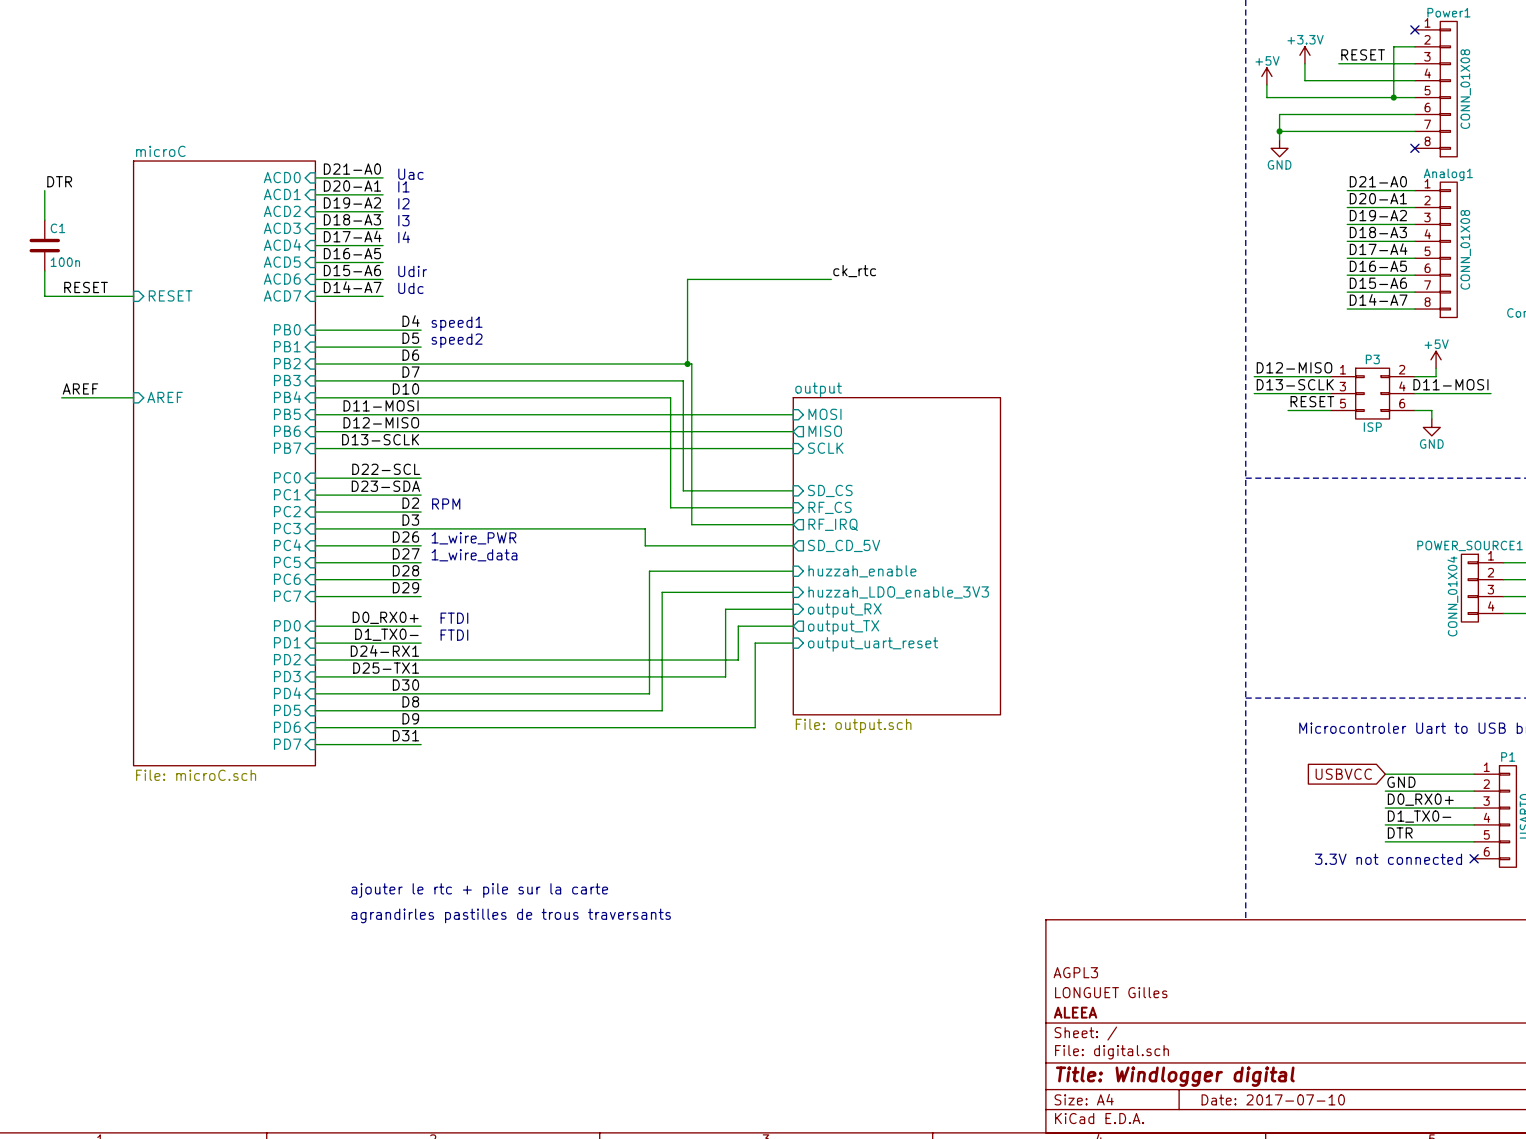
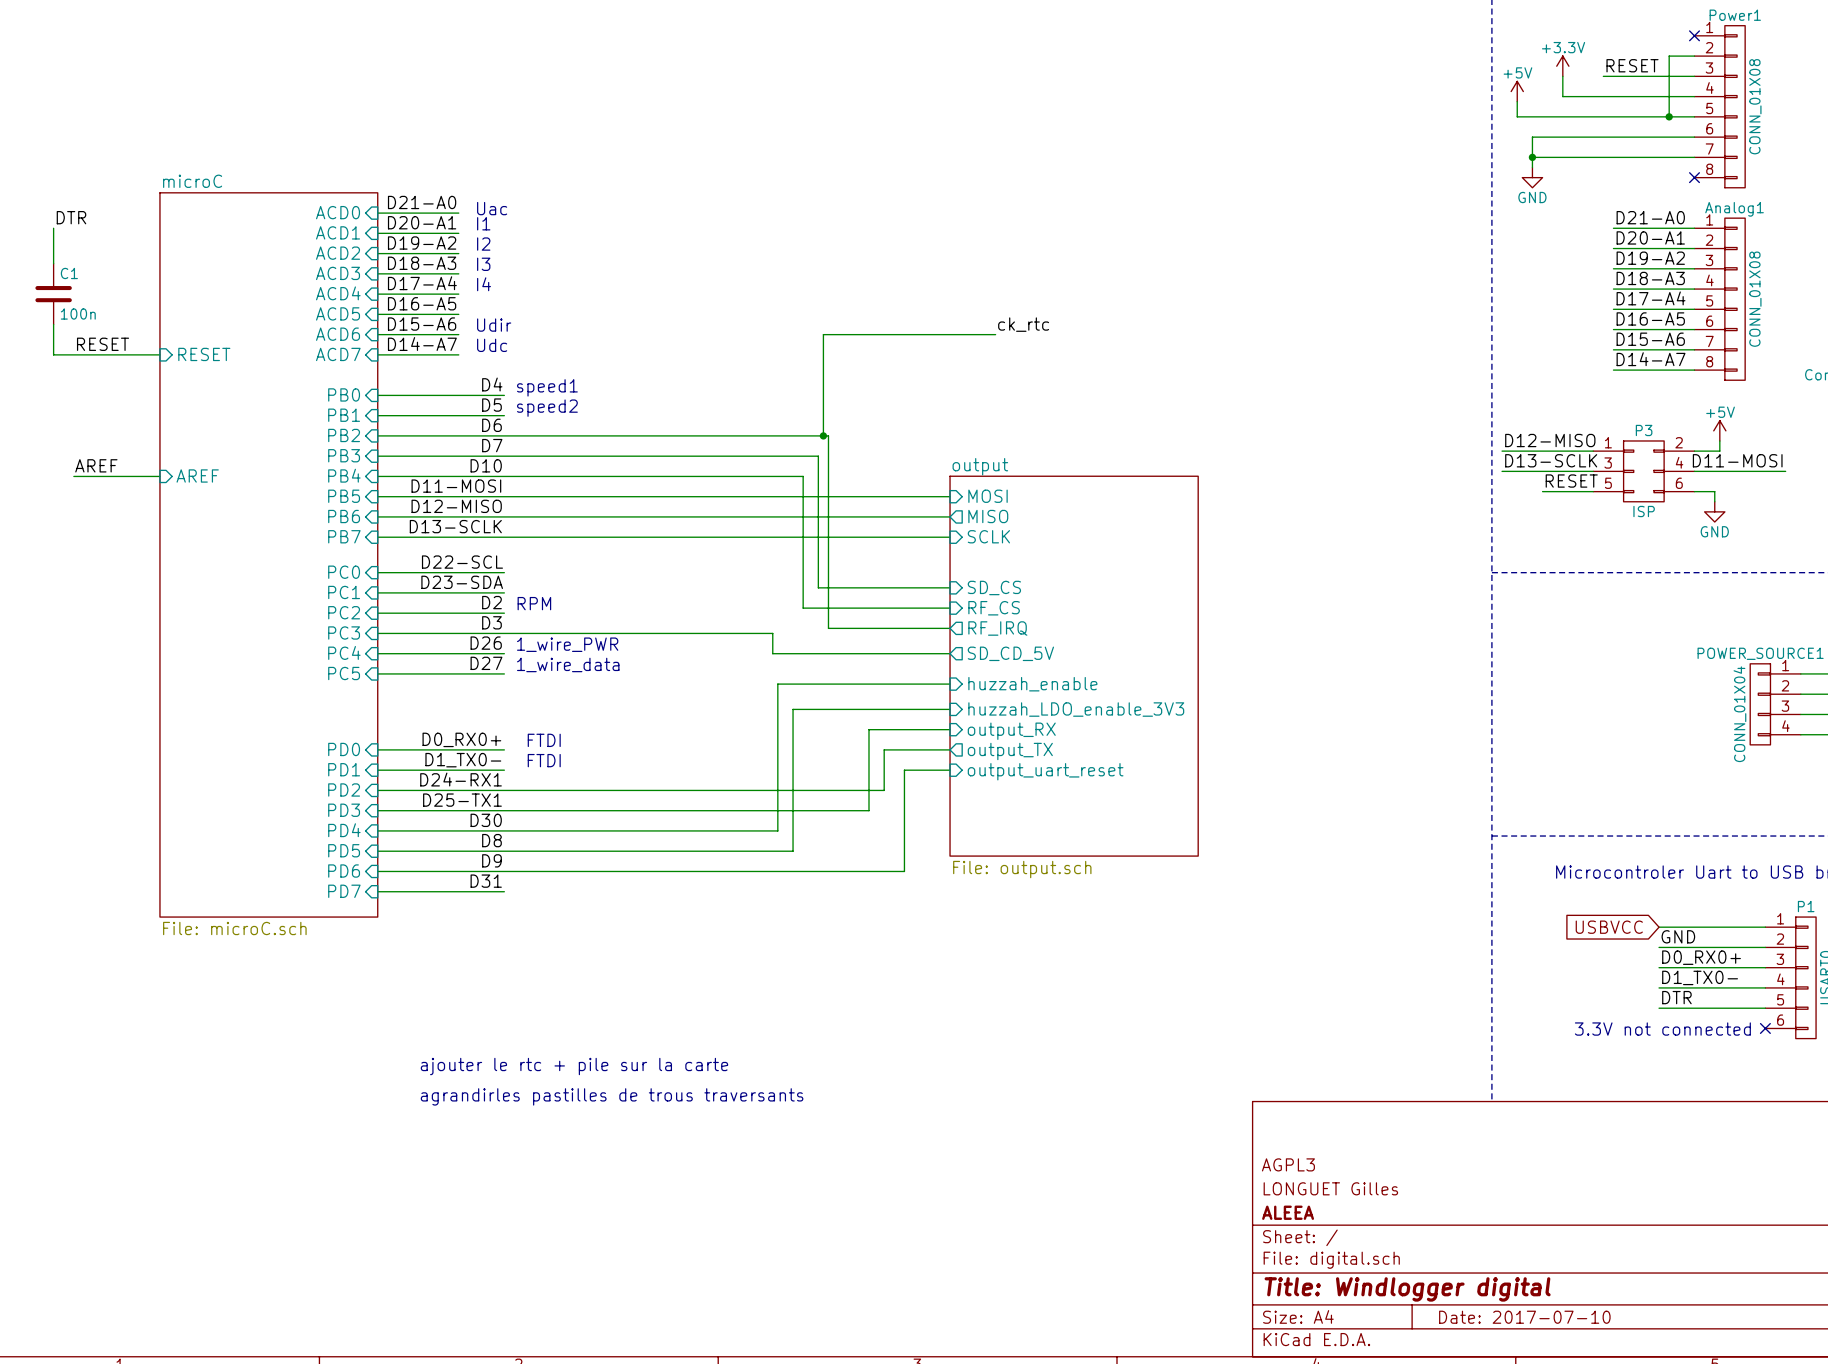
label: D28 (405, 570) -> none
sheet pin: PC6 (287, 579) -> none
wire: (315, 579) (421, 579) -> none
label: D29 (405, 587) -> none
sheet pin: PC7 (287, 596) -> none
wire: (315, 596) (421, 596) -> none

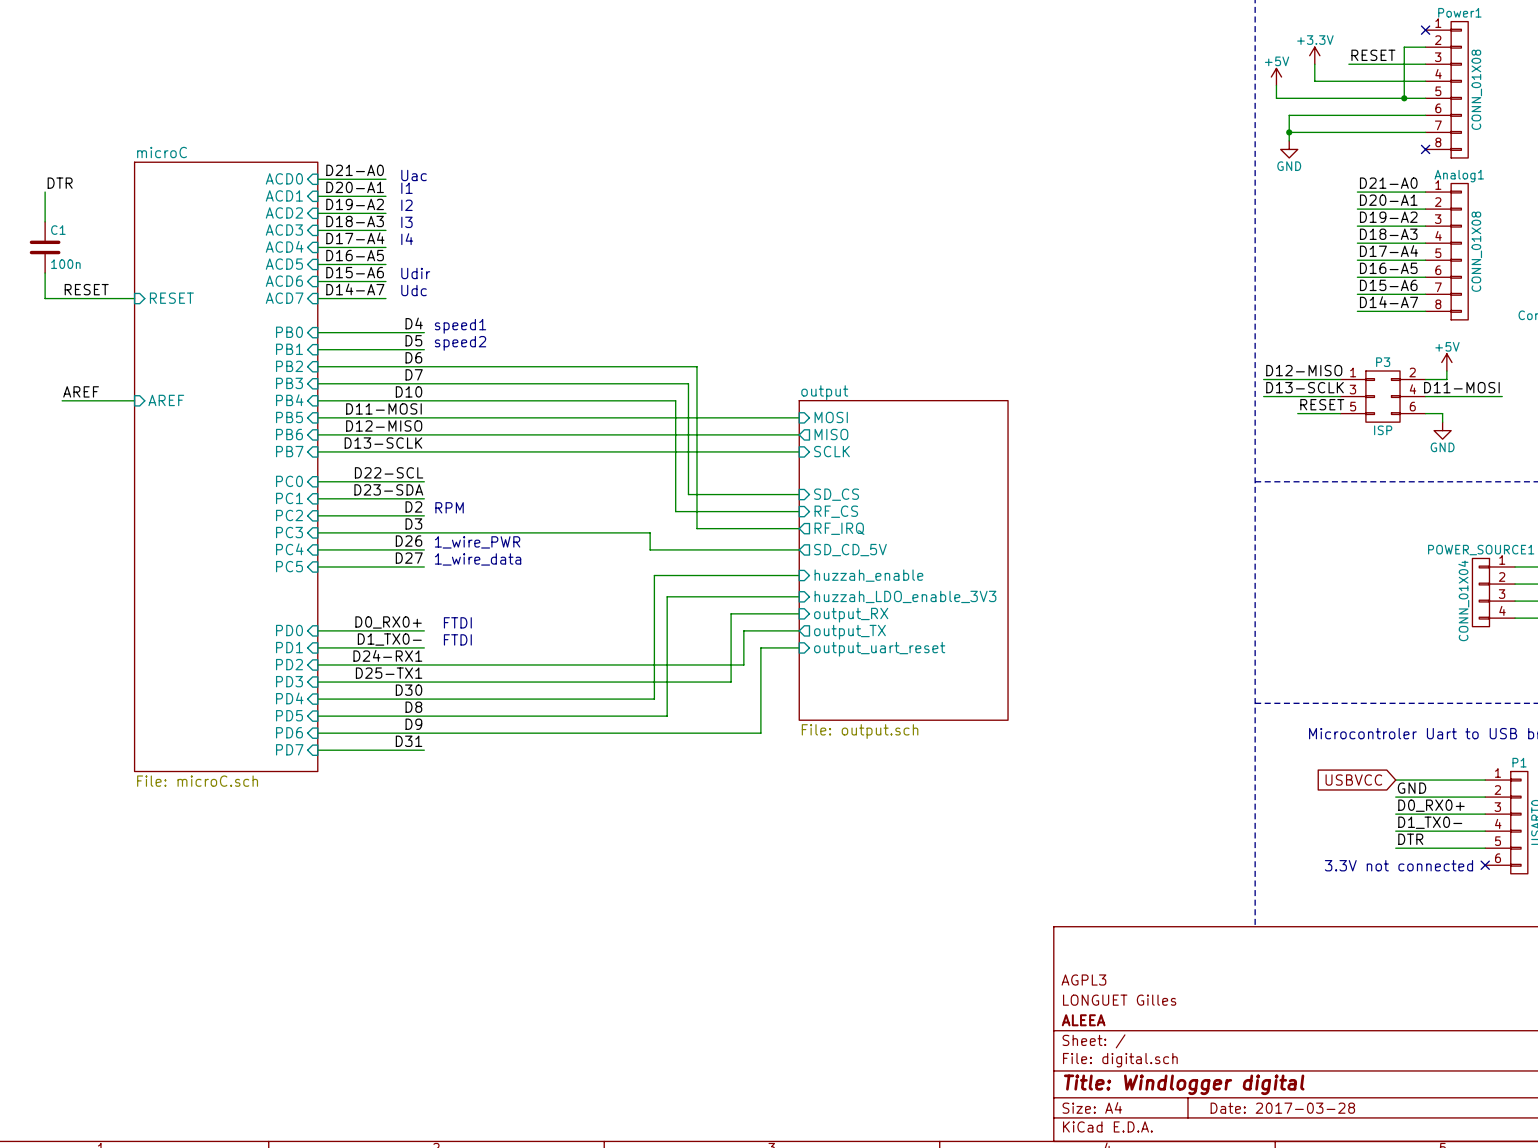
label: ck_rtc (1023, 324) -> none
wire: (995, 334) (823, 334) (823, 435) -> none
junction: (823, 435) -> none
text: ajouter le rtc + pile sur la carte (574, 1066) -> none
text: agrandirles pastilles de trous traversants (612, 1096) -> none
title block: Date: 2017-07-10 (1524, 1317) -> Date: 2017-03-28 (1282, 1108)

